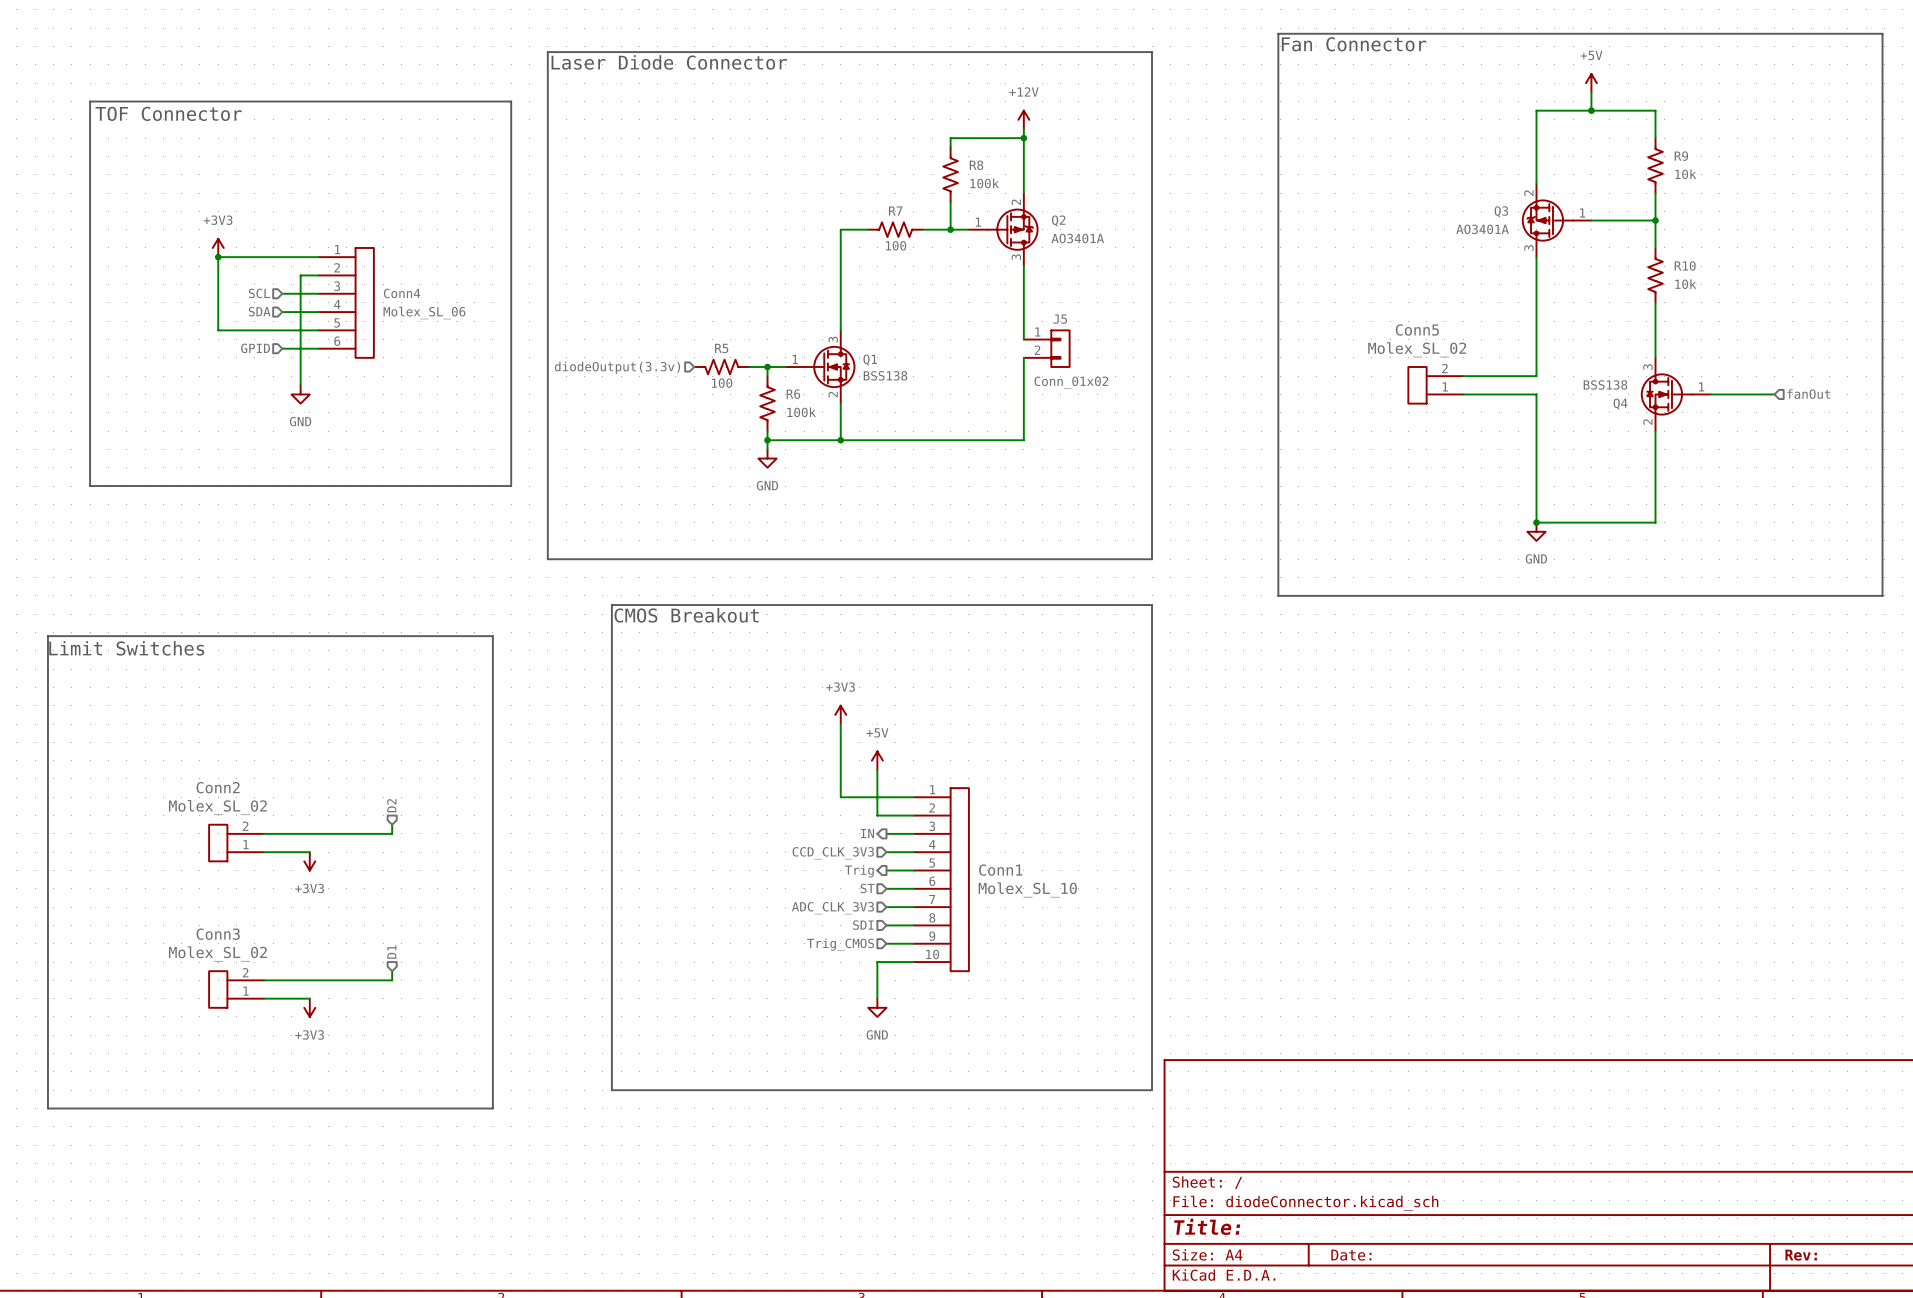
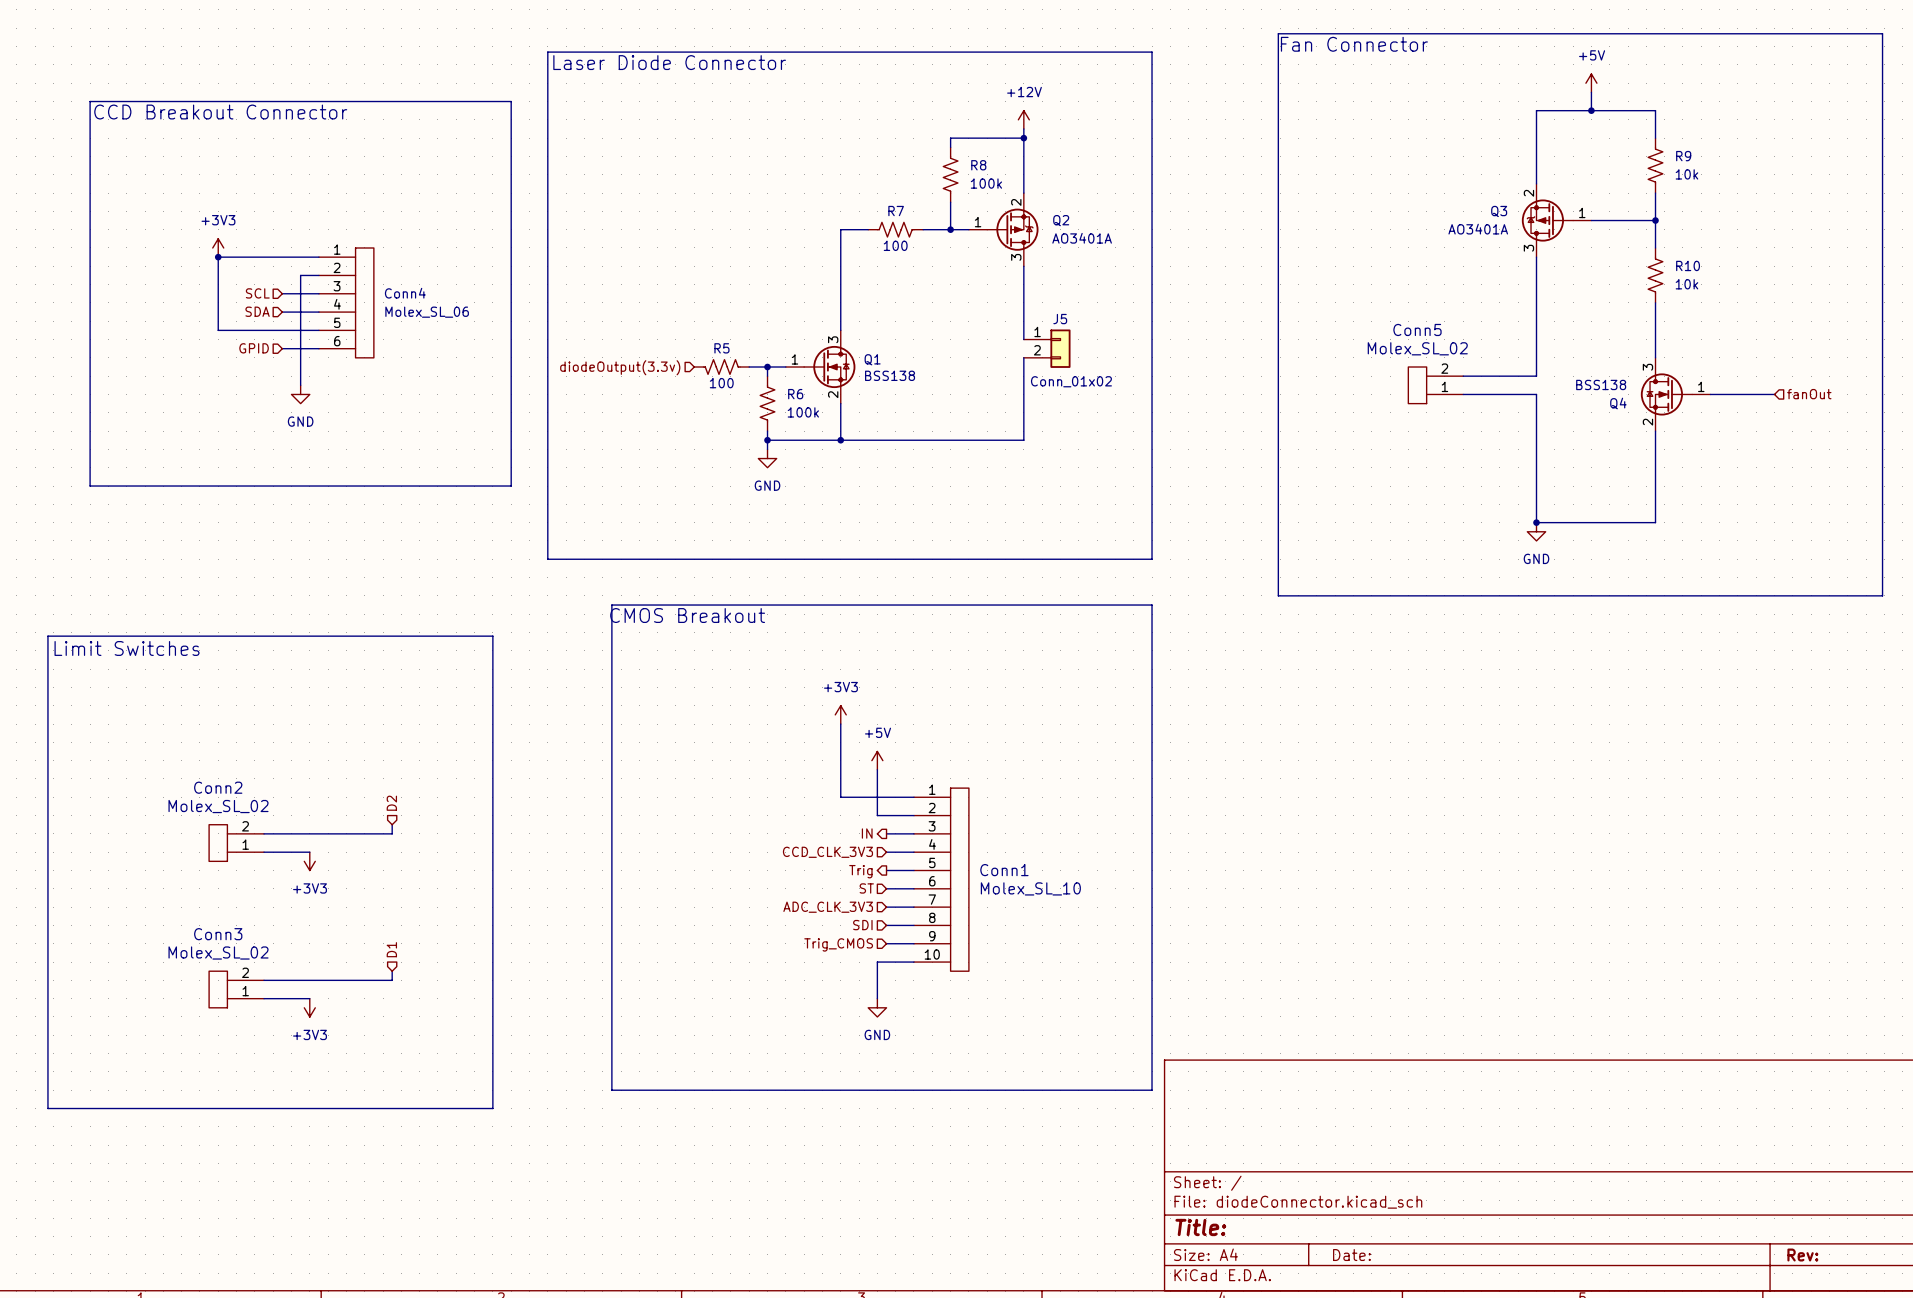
text: none -> CCD Breakout Connector (220, 112)
text: TOF Connector (168, 113) -> none

